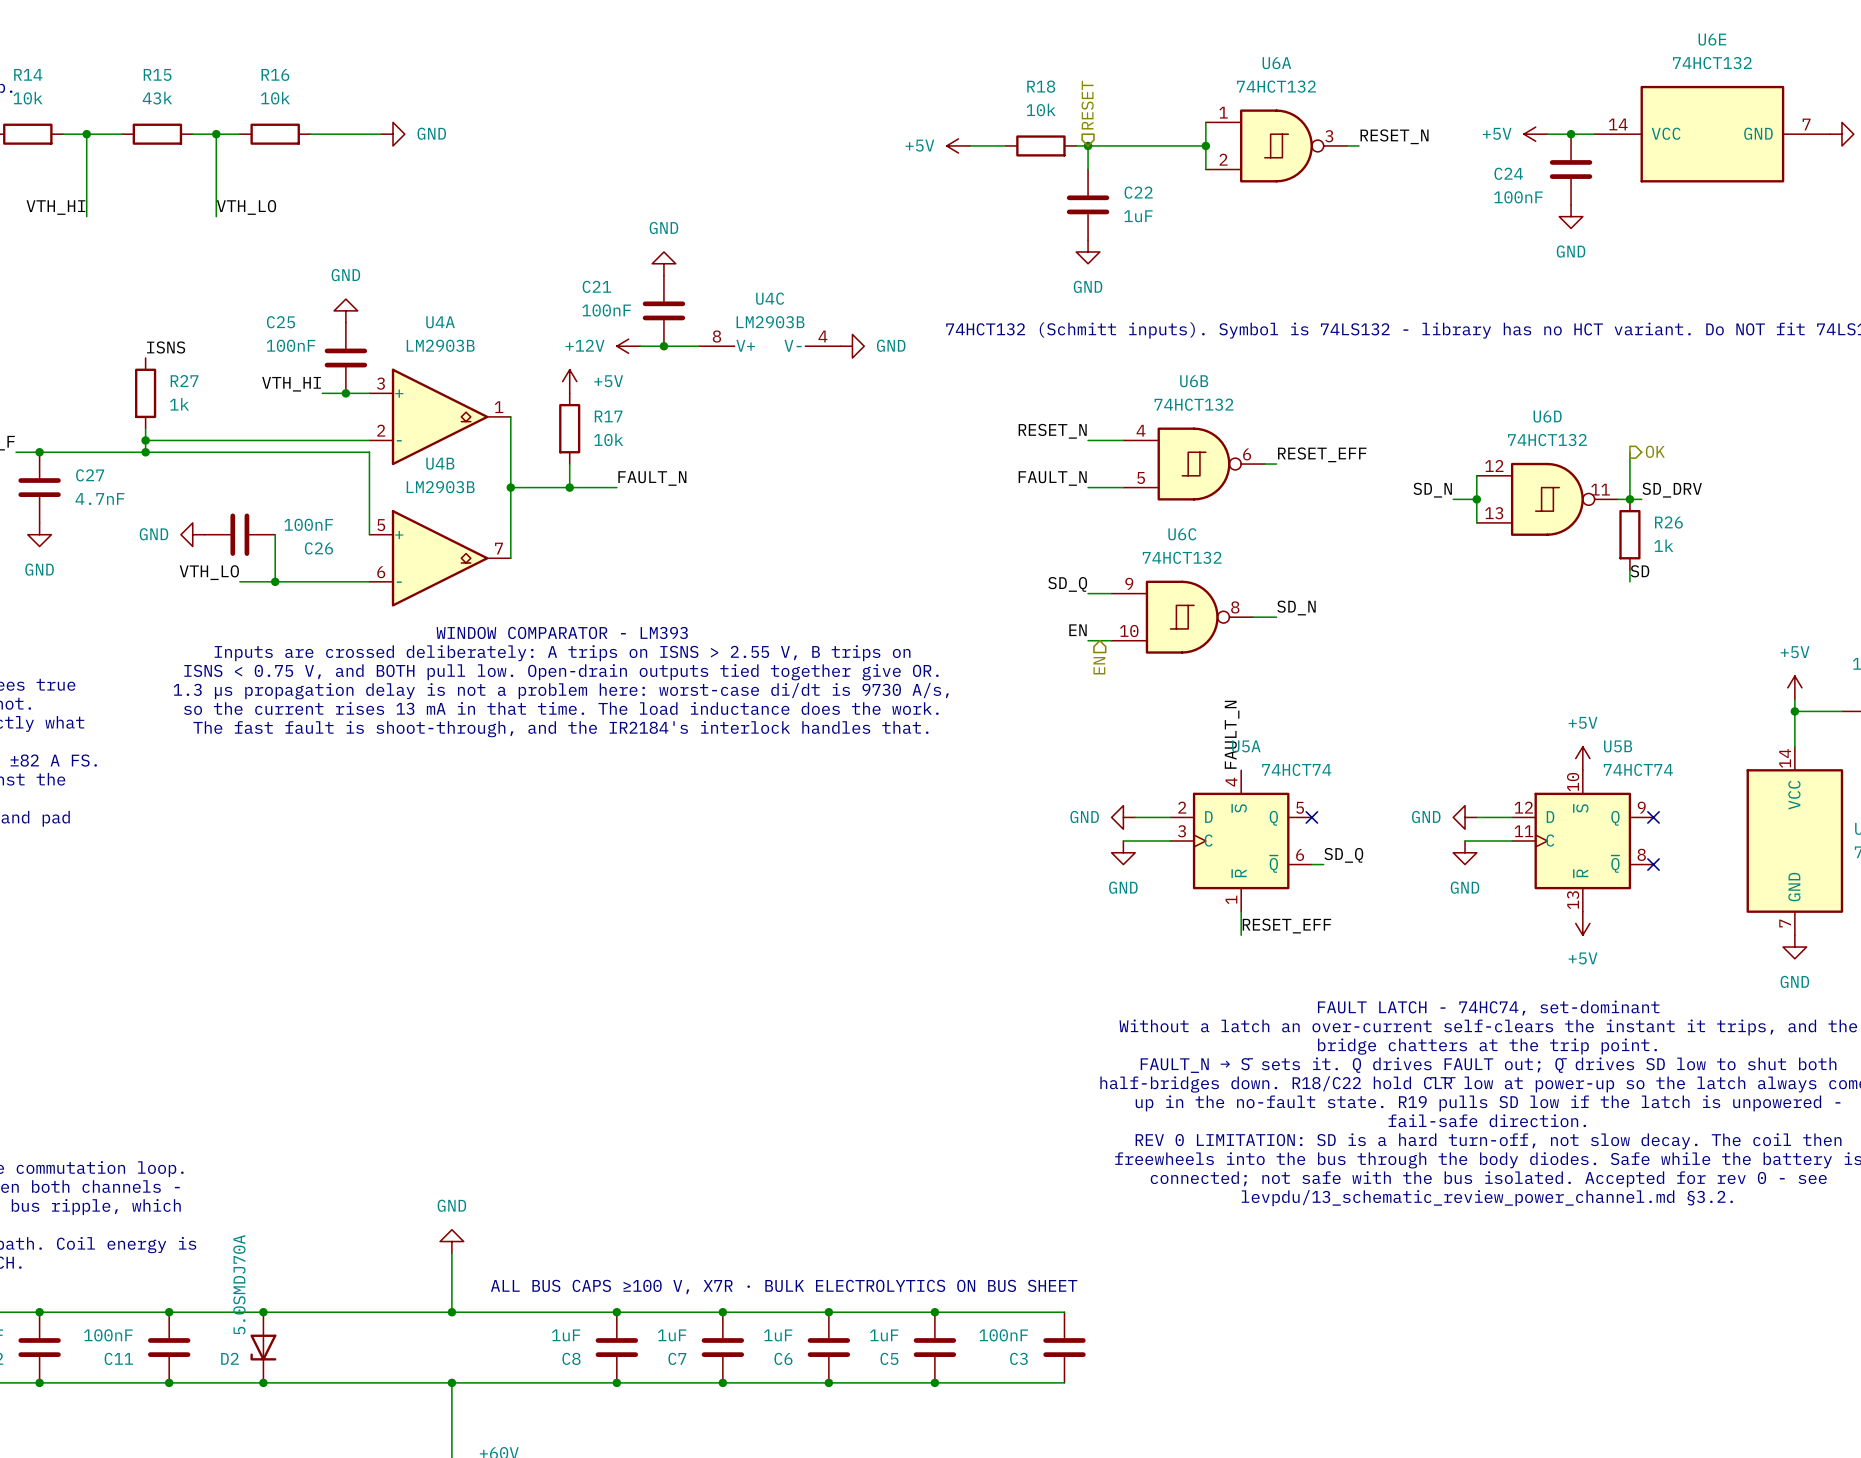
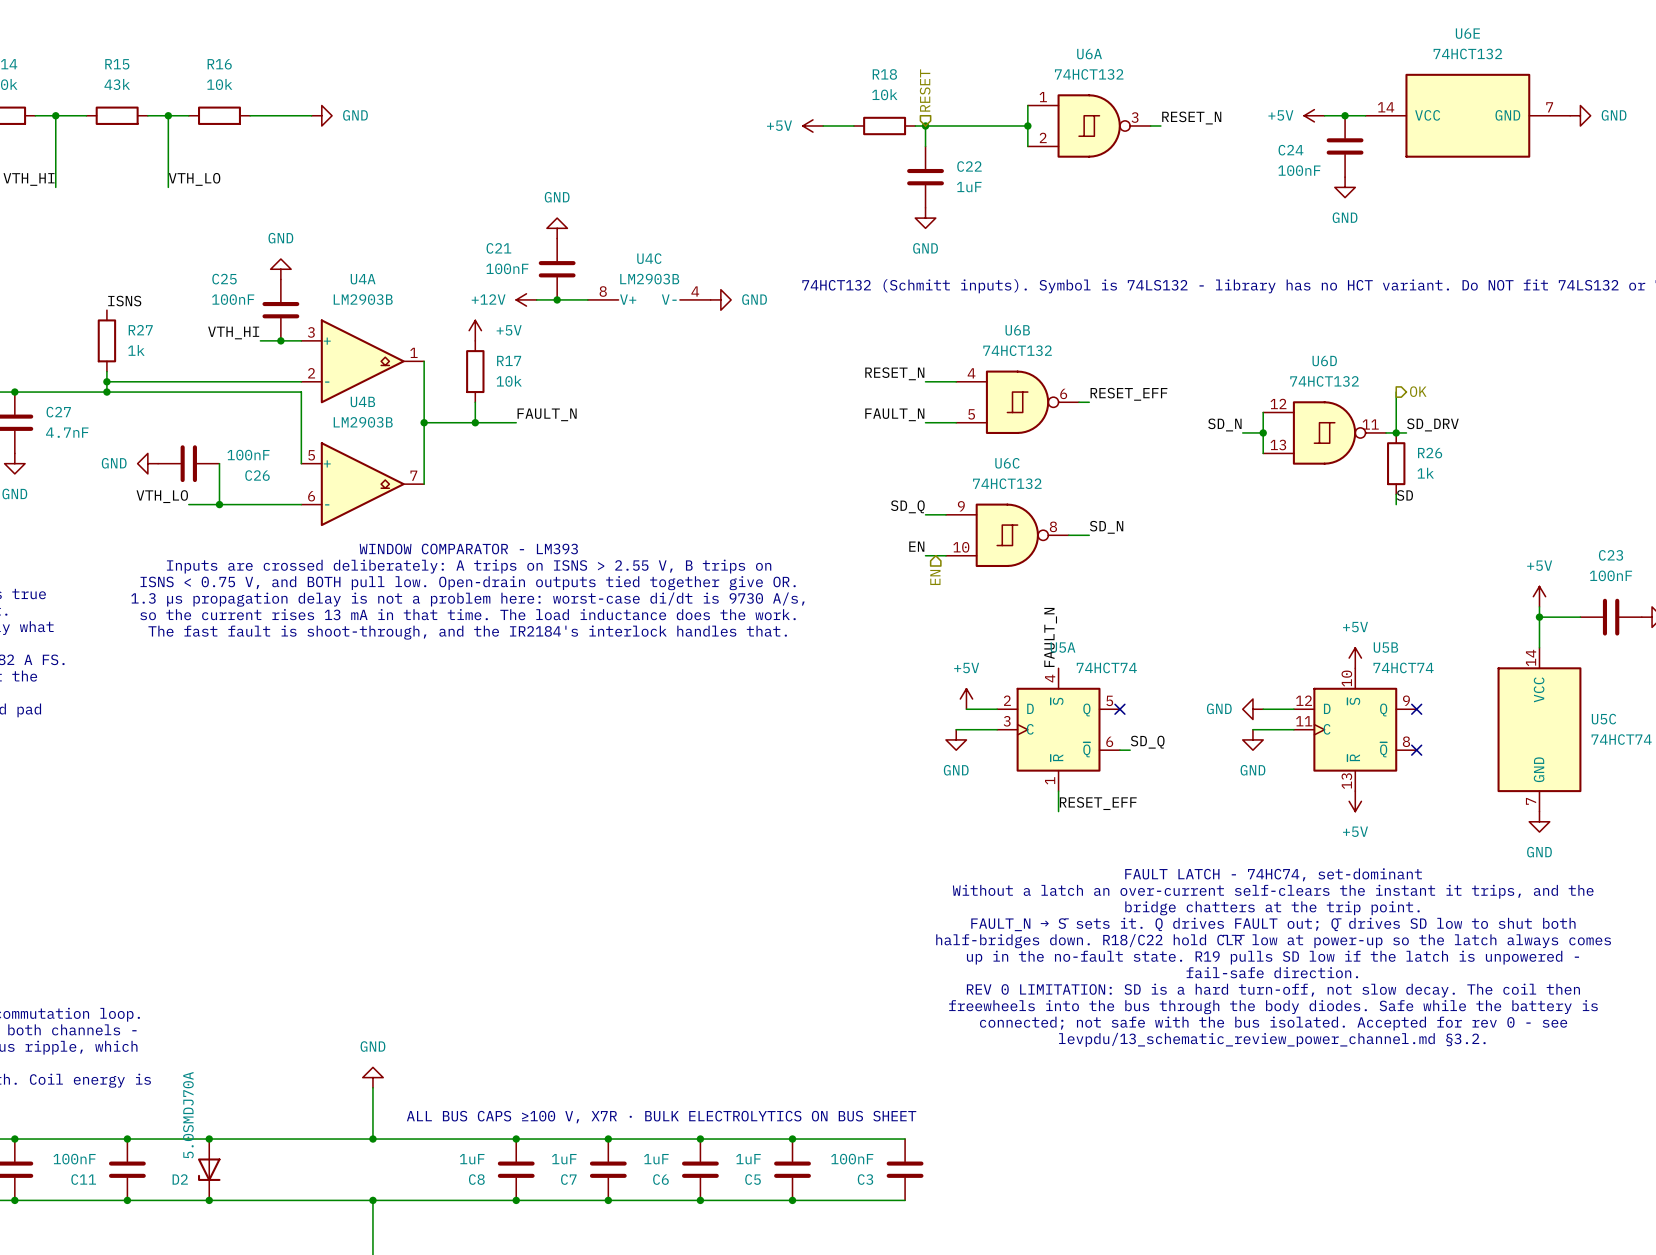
power symbol: none -> +5V (966, 699)
power symbol: GND (1123, 817) -> none

